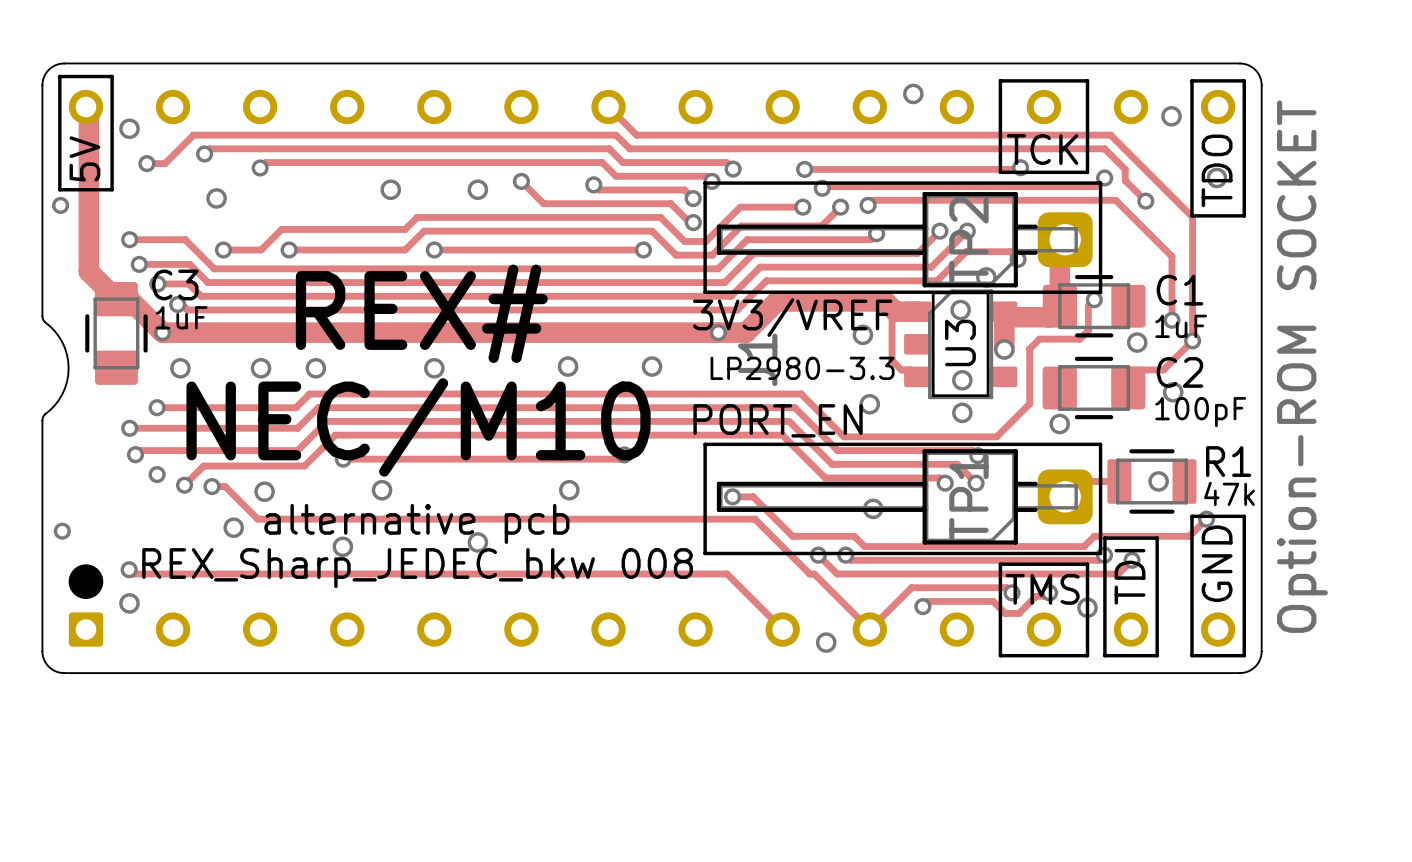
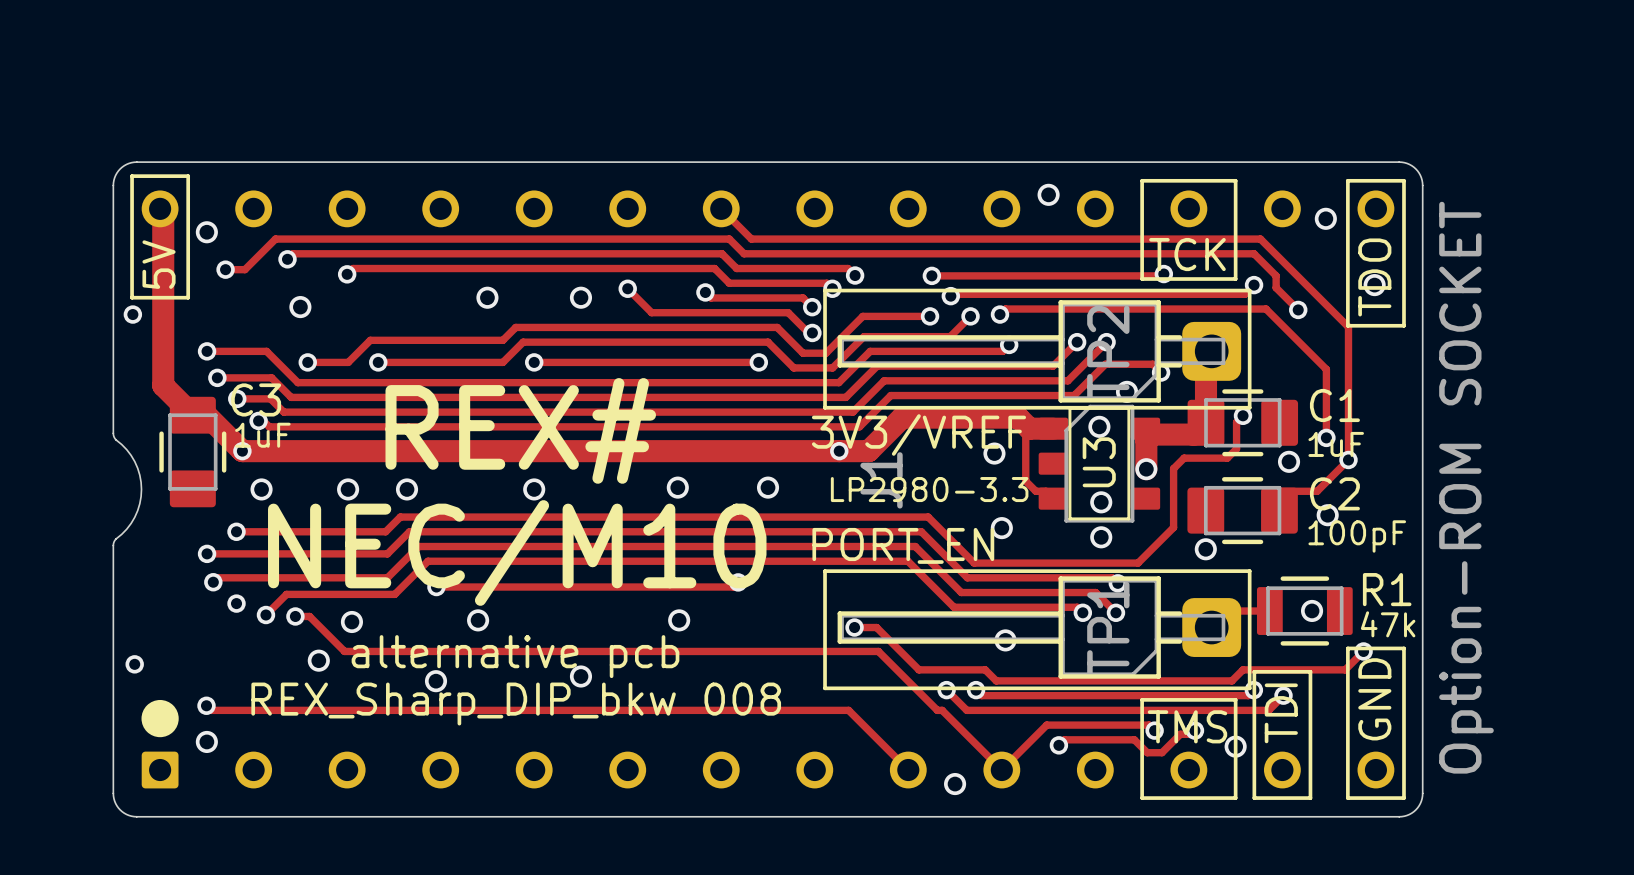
text: REX_Sharp_JEDEC_bkw 008 (417, 568) -> REX_Sharp_DIP_bkw 008 (516, 704)

